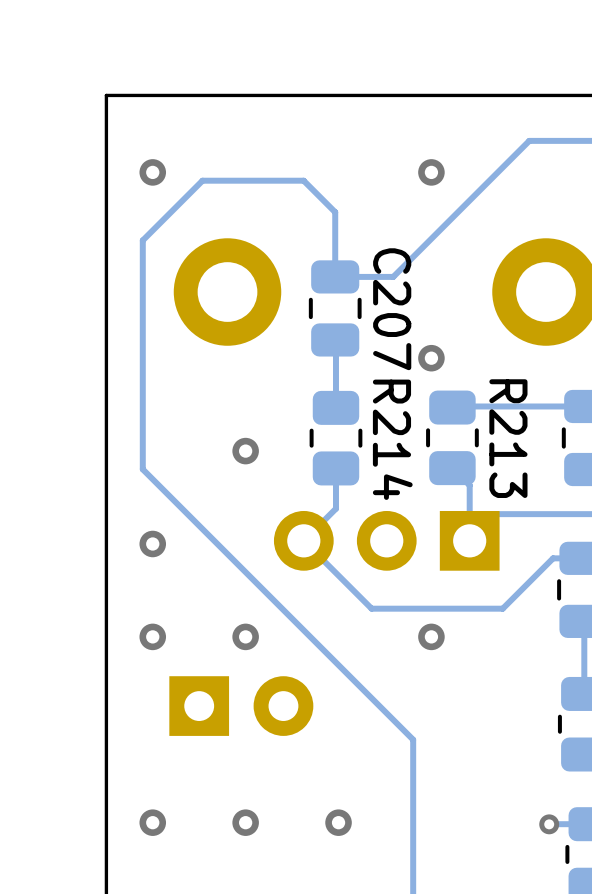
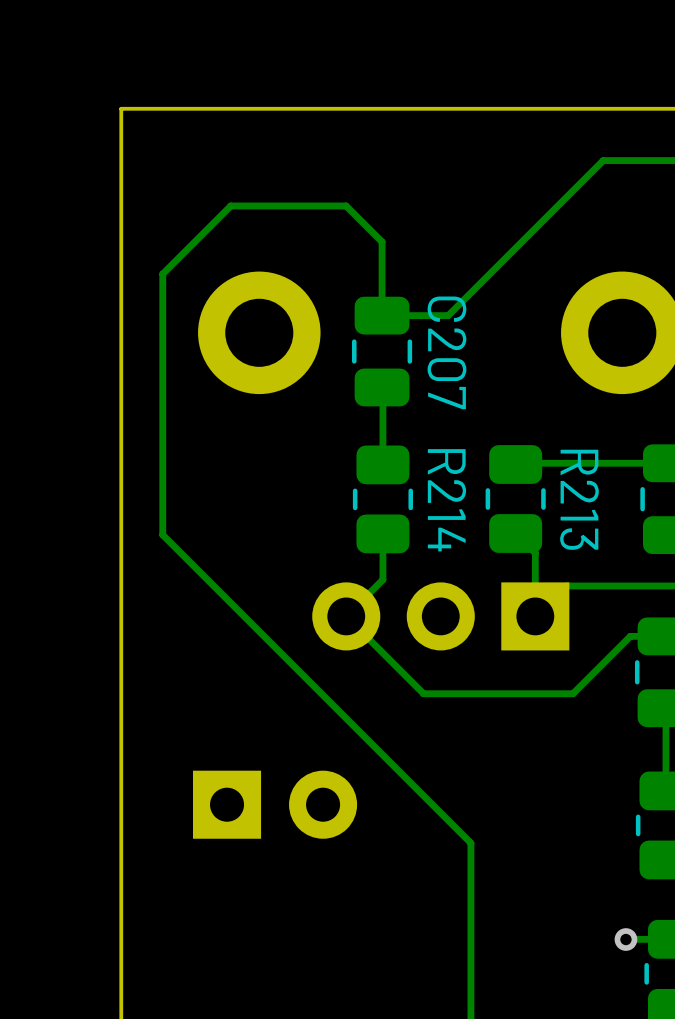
via: (152, 172) -> none
via: (431, 172) -> none
via: (431, 358) -> none
via: (245, 451) -> none
via: (152, 543) -> none
via: (152, 636) -> none
via: (245, 636) -> none
via: (431, 636) -> none
via: (152, 822) -> none
via: (245, 822) -> none
via: (338, 822) -> none

